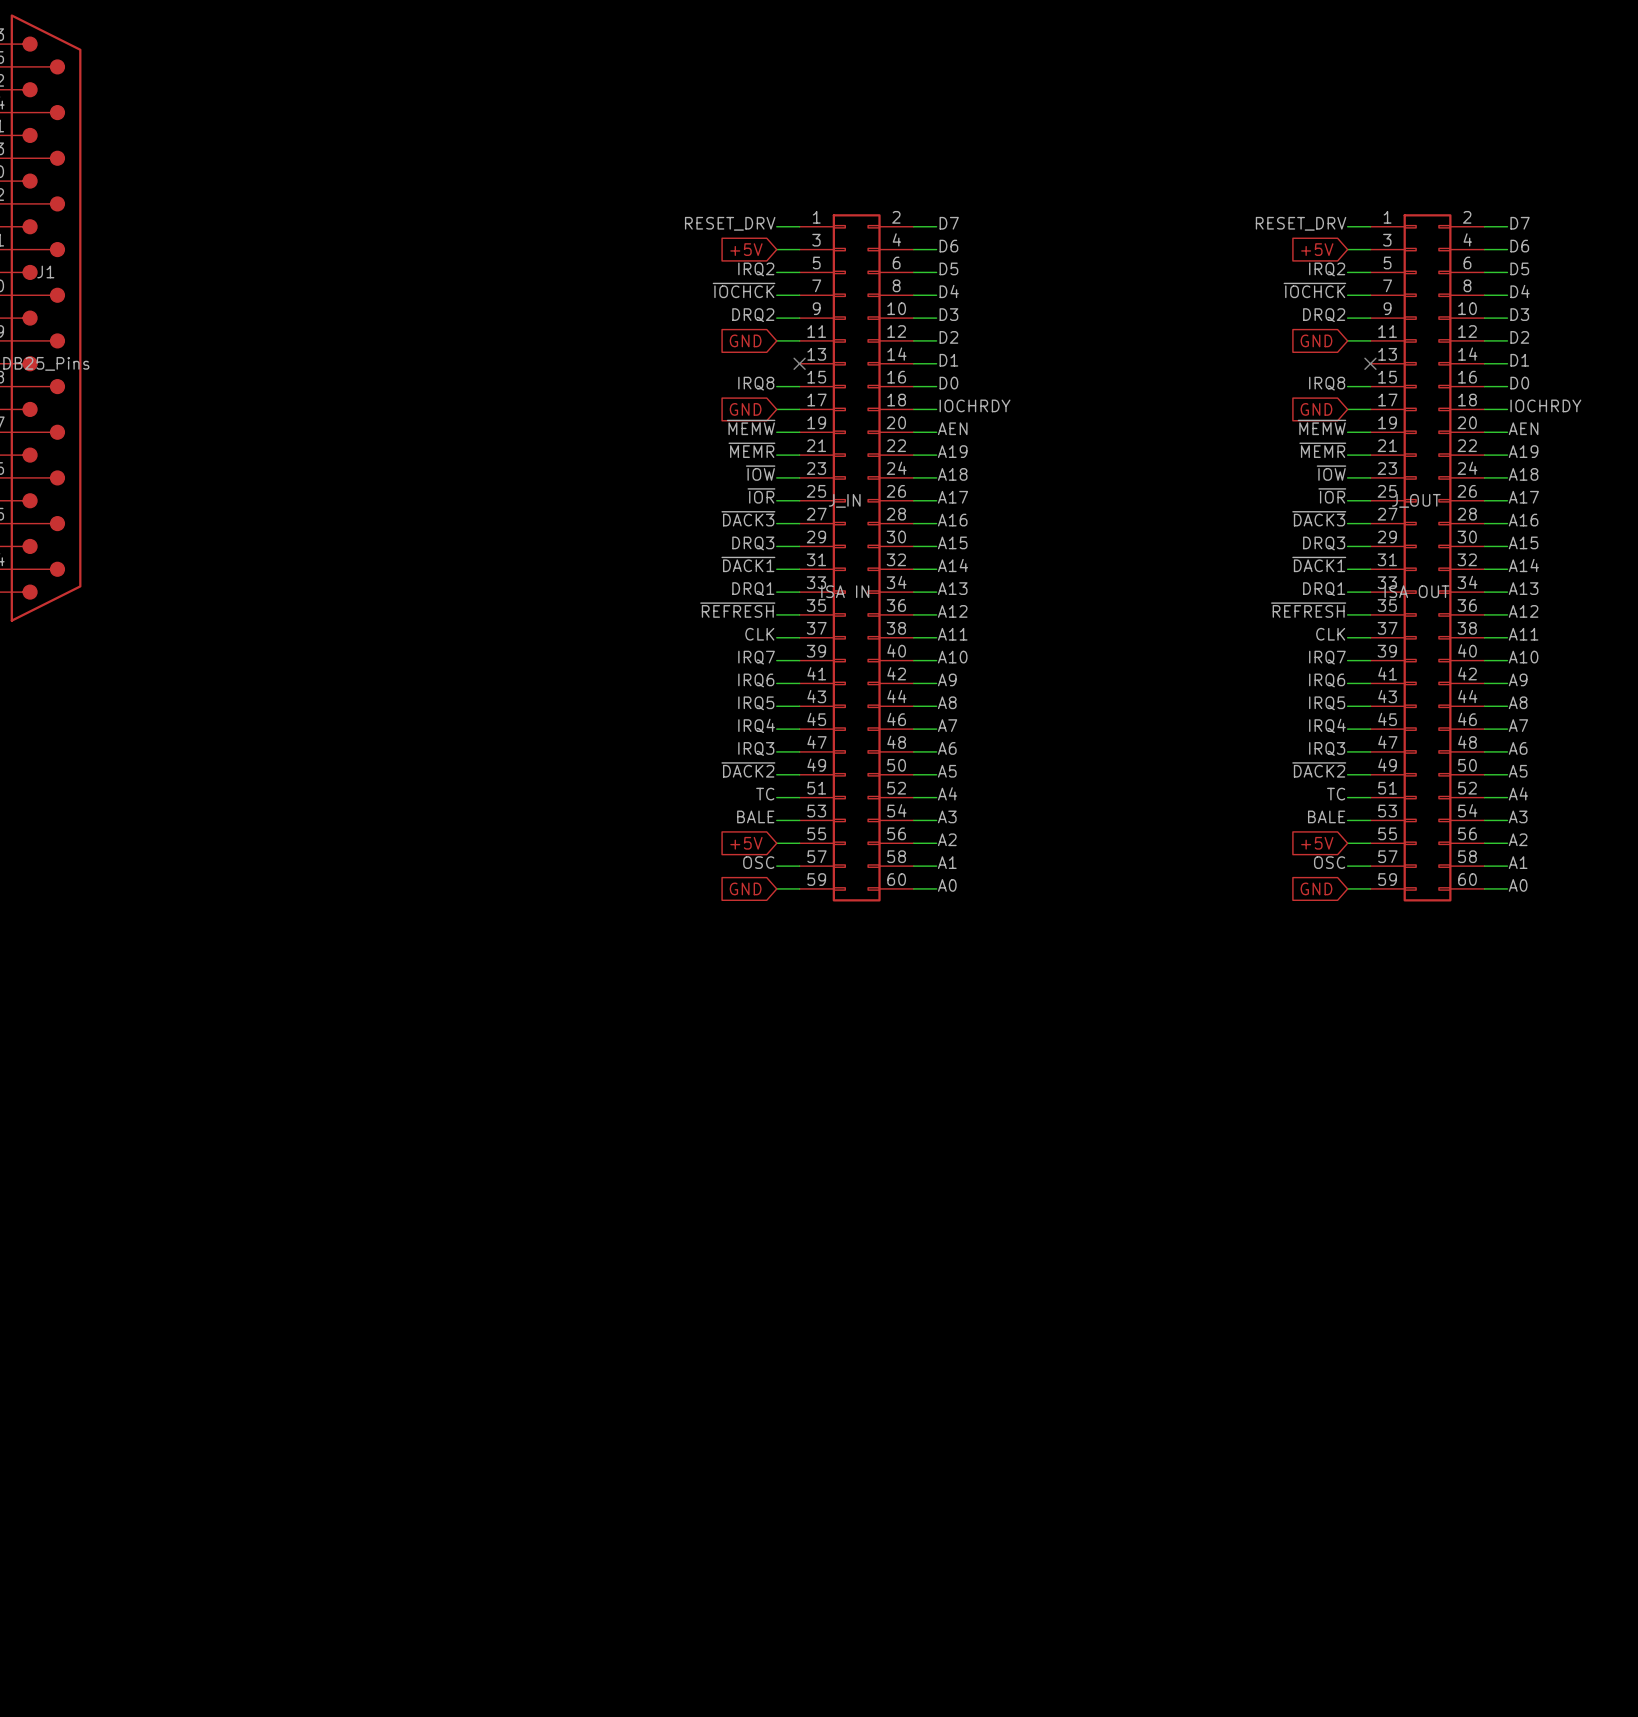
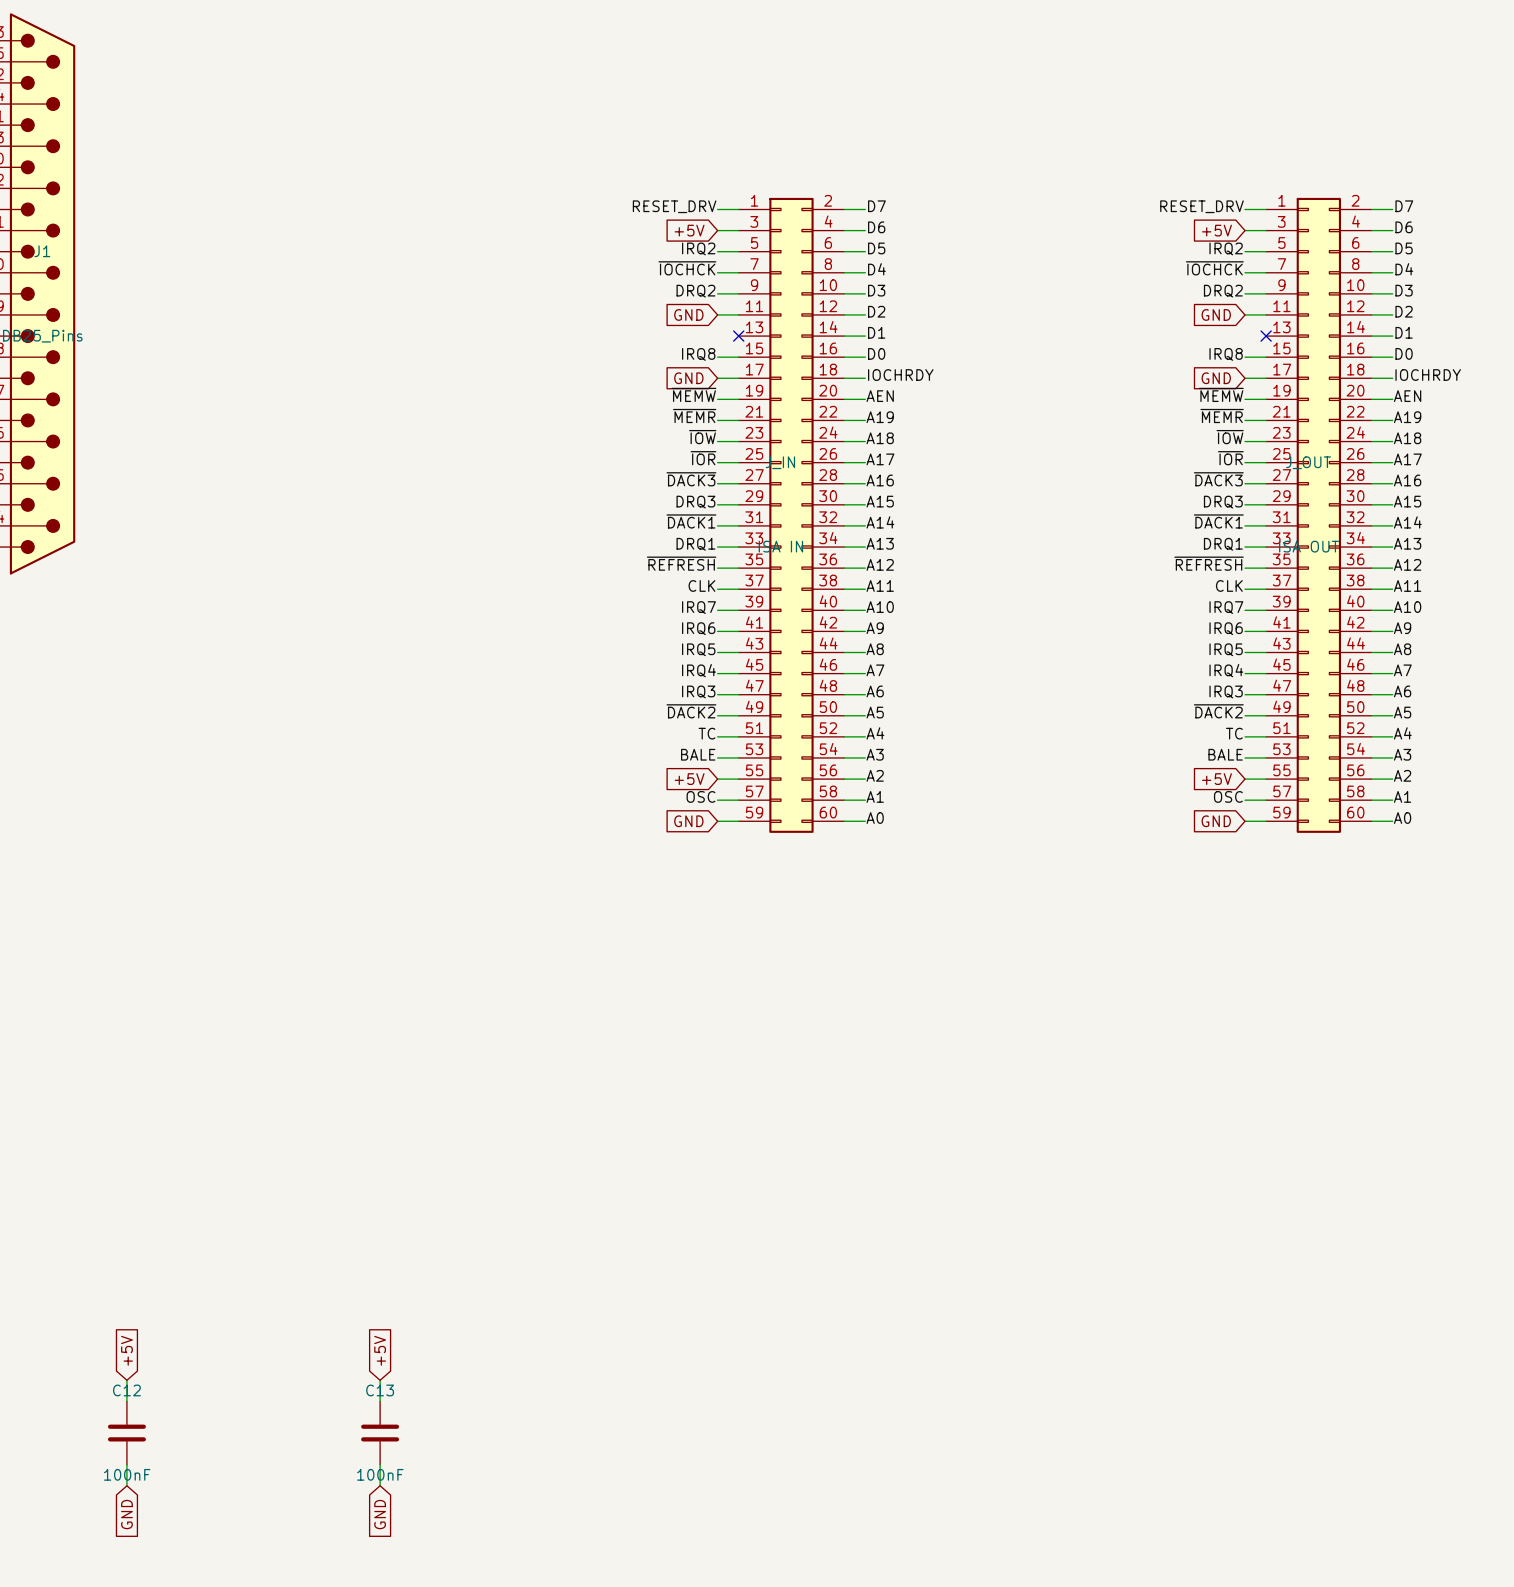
global label: none -> +5V (126, 1350)
global label: none -> +5V (380, 1350)
wire: none -> (126, 1380) (126, 1401)
wire: none -> (380, 1380) (380, 1401)
C12: none -> 100nF (126, 1433)
C13: none -> 100nF (380, 1433)
wire: none -> (126, 1464) (126, 1485)
wire: none -> (380, 1464) (380, 1485)
global label: none -> GND (126, 1514)
global label: none -> GND (380, 1514)

